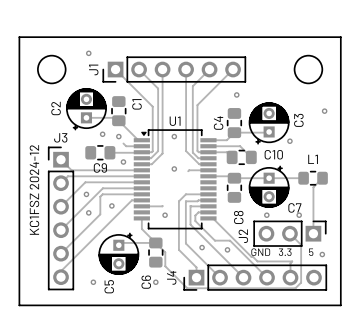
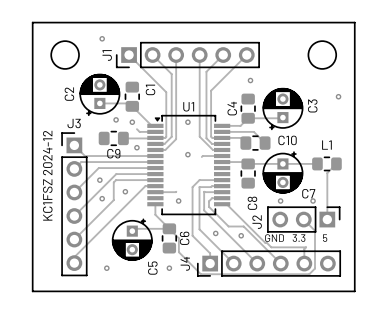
via: (289, 141) -> none
via: (322, 254) -> none
C6 name position: C6 (146, 282) -> C6 (184, 238)
C5 name position: C5 (109, 286) -> C5 (152, 268)

